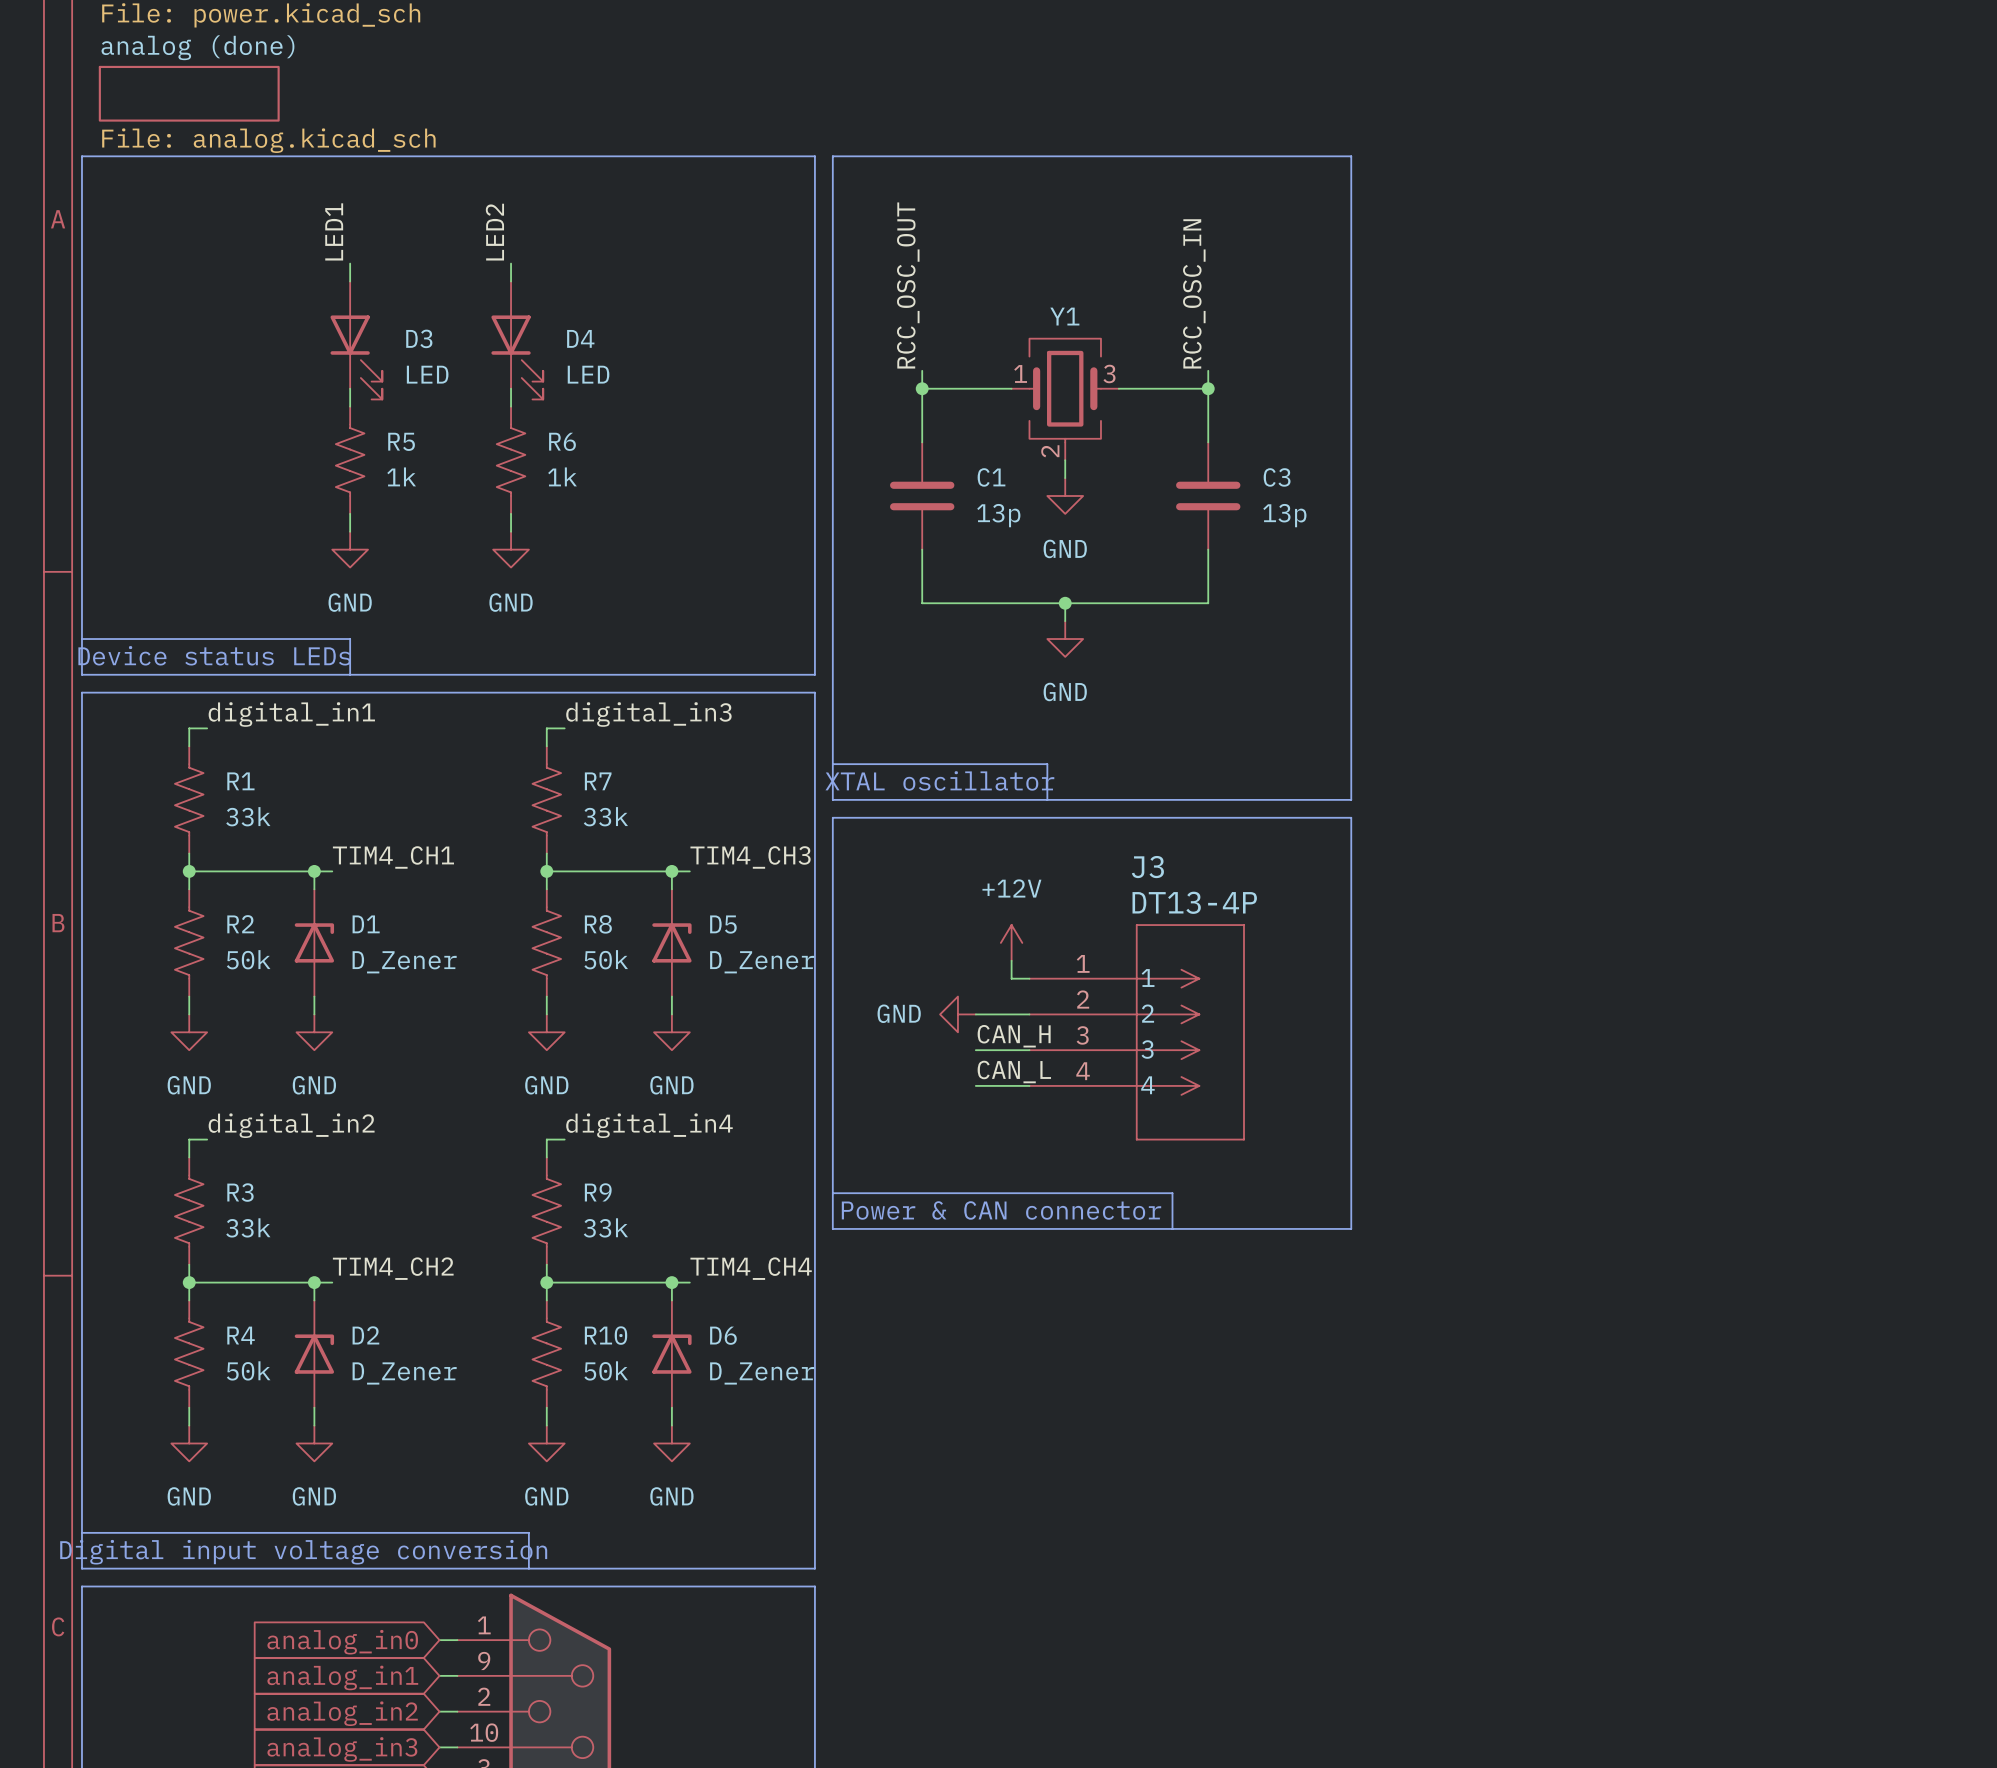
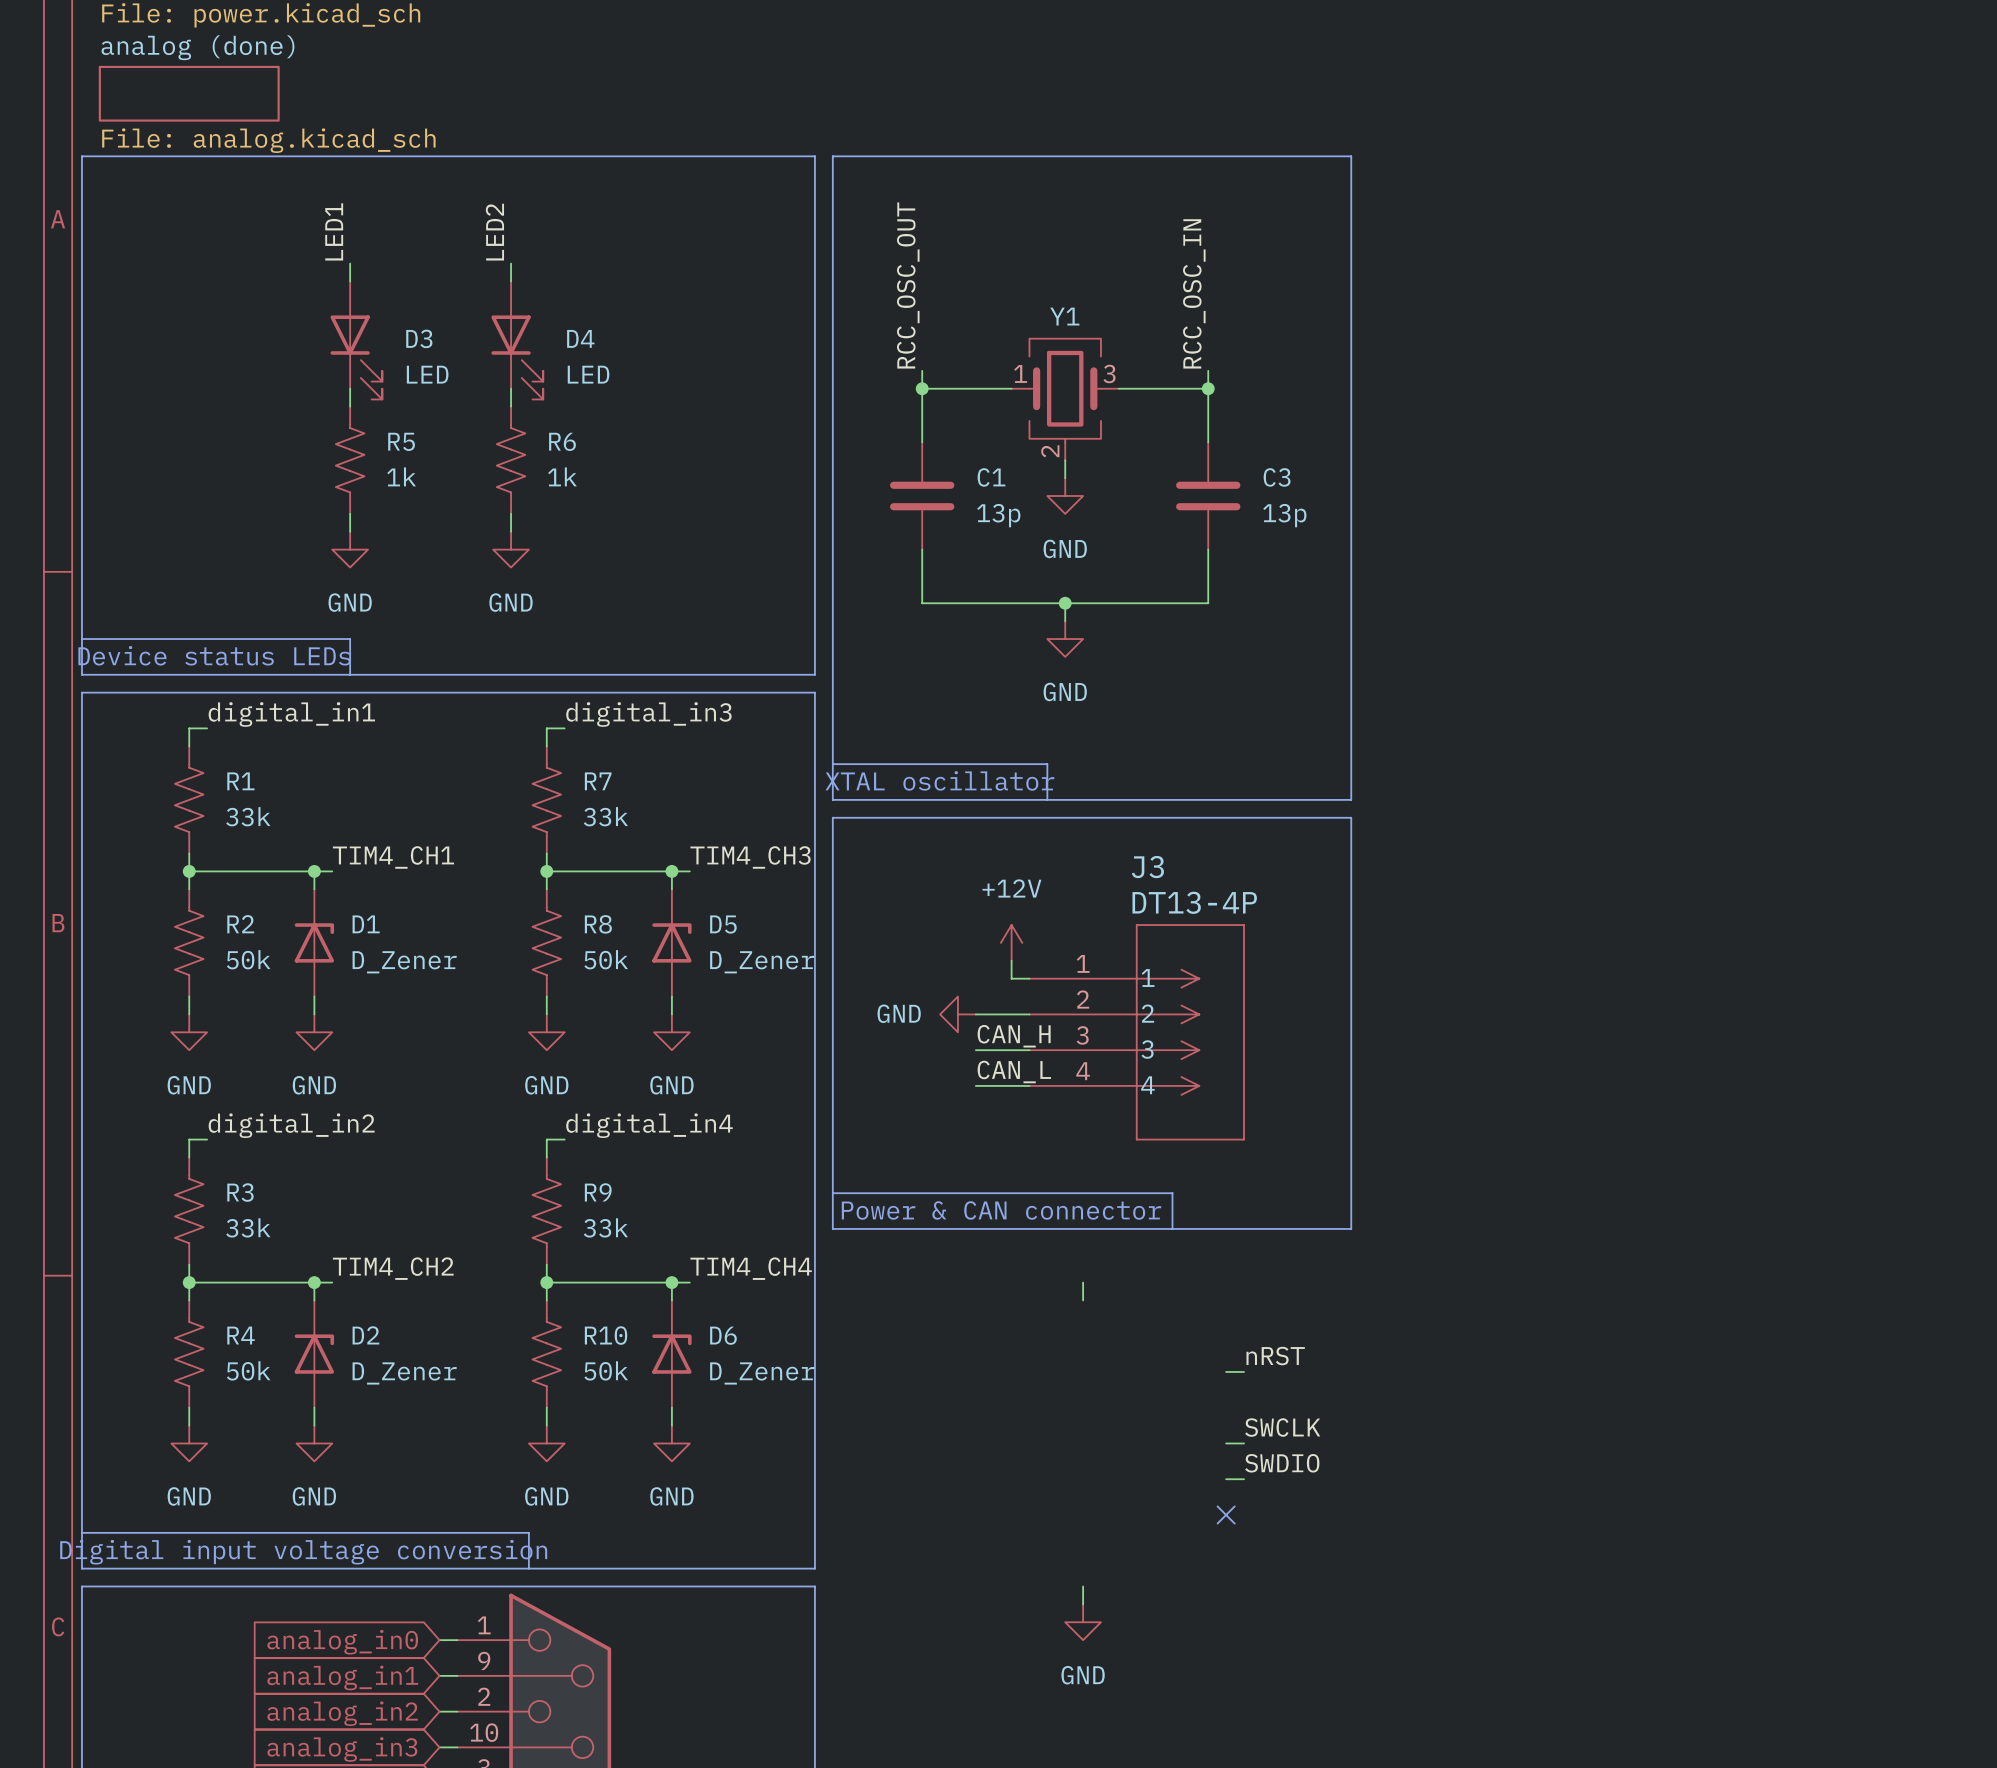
wire: none -> (1083, 1282) (1083, 1300)
label: none -> nRST (1275, 1356)
wire: none -> (1226, 1371) (1244, 1371)
label: none -> SWCLK (1282, 1427)
wire: none -> (1226, 1443) (1244, 1443)
label: none -> SWDIO (1282, 1463)
wire: none -> (1226, 1479) (1244, 1479)
no-connect mark: none -> (1226, 1514)
wire: none -> (1083, 1586) (1083, 1604)
power symbol: none -> GND (1083, 1622)

